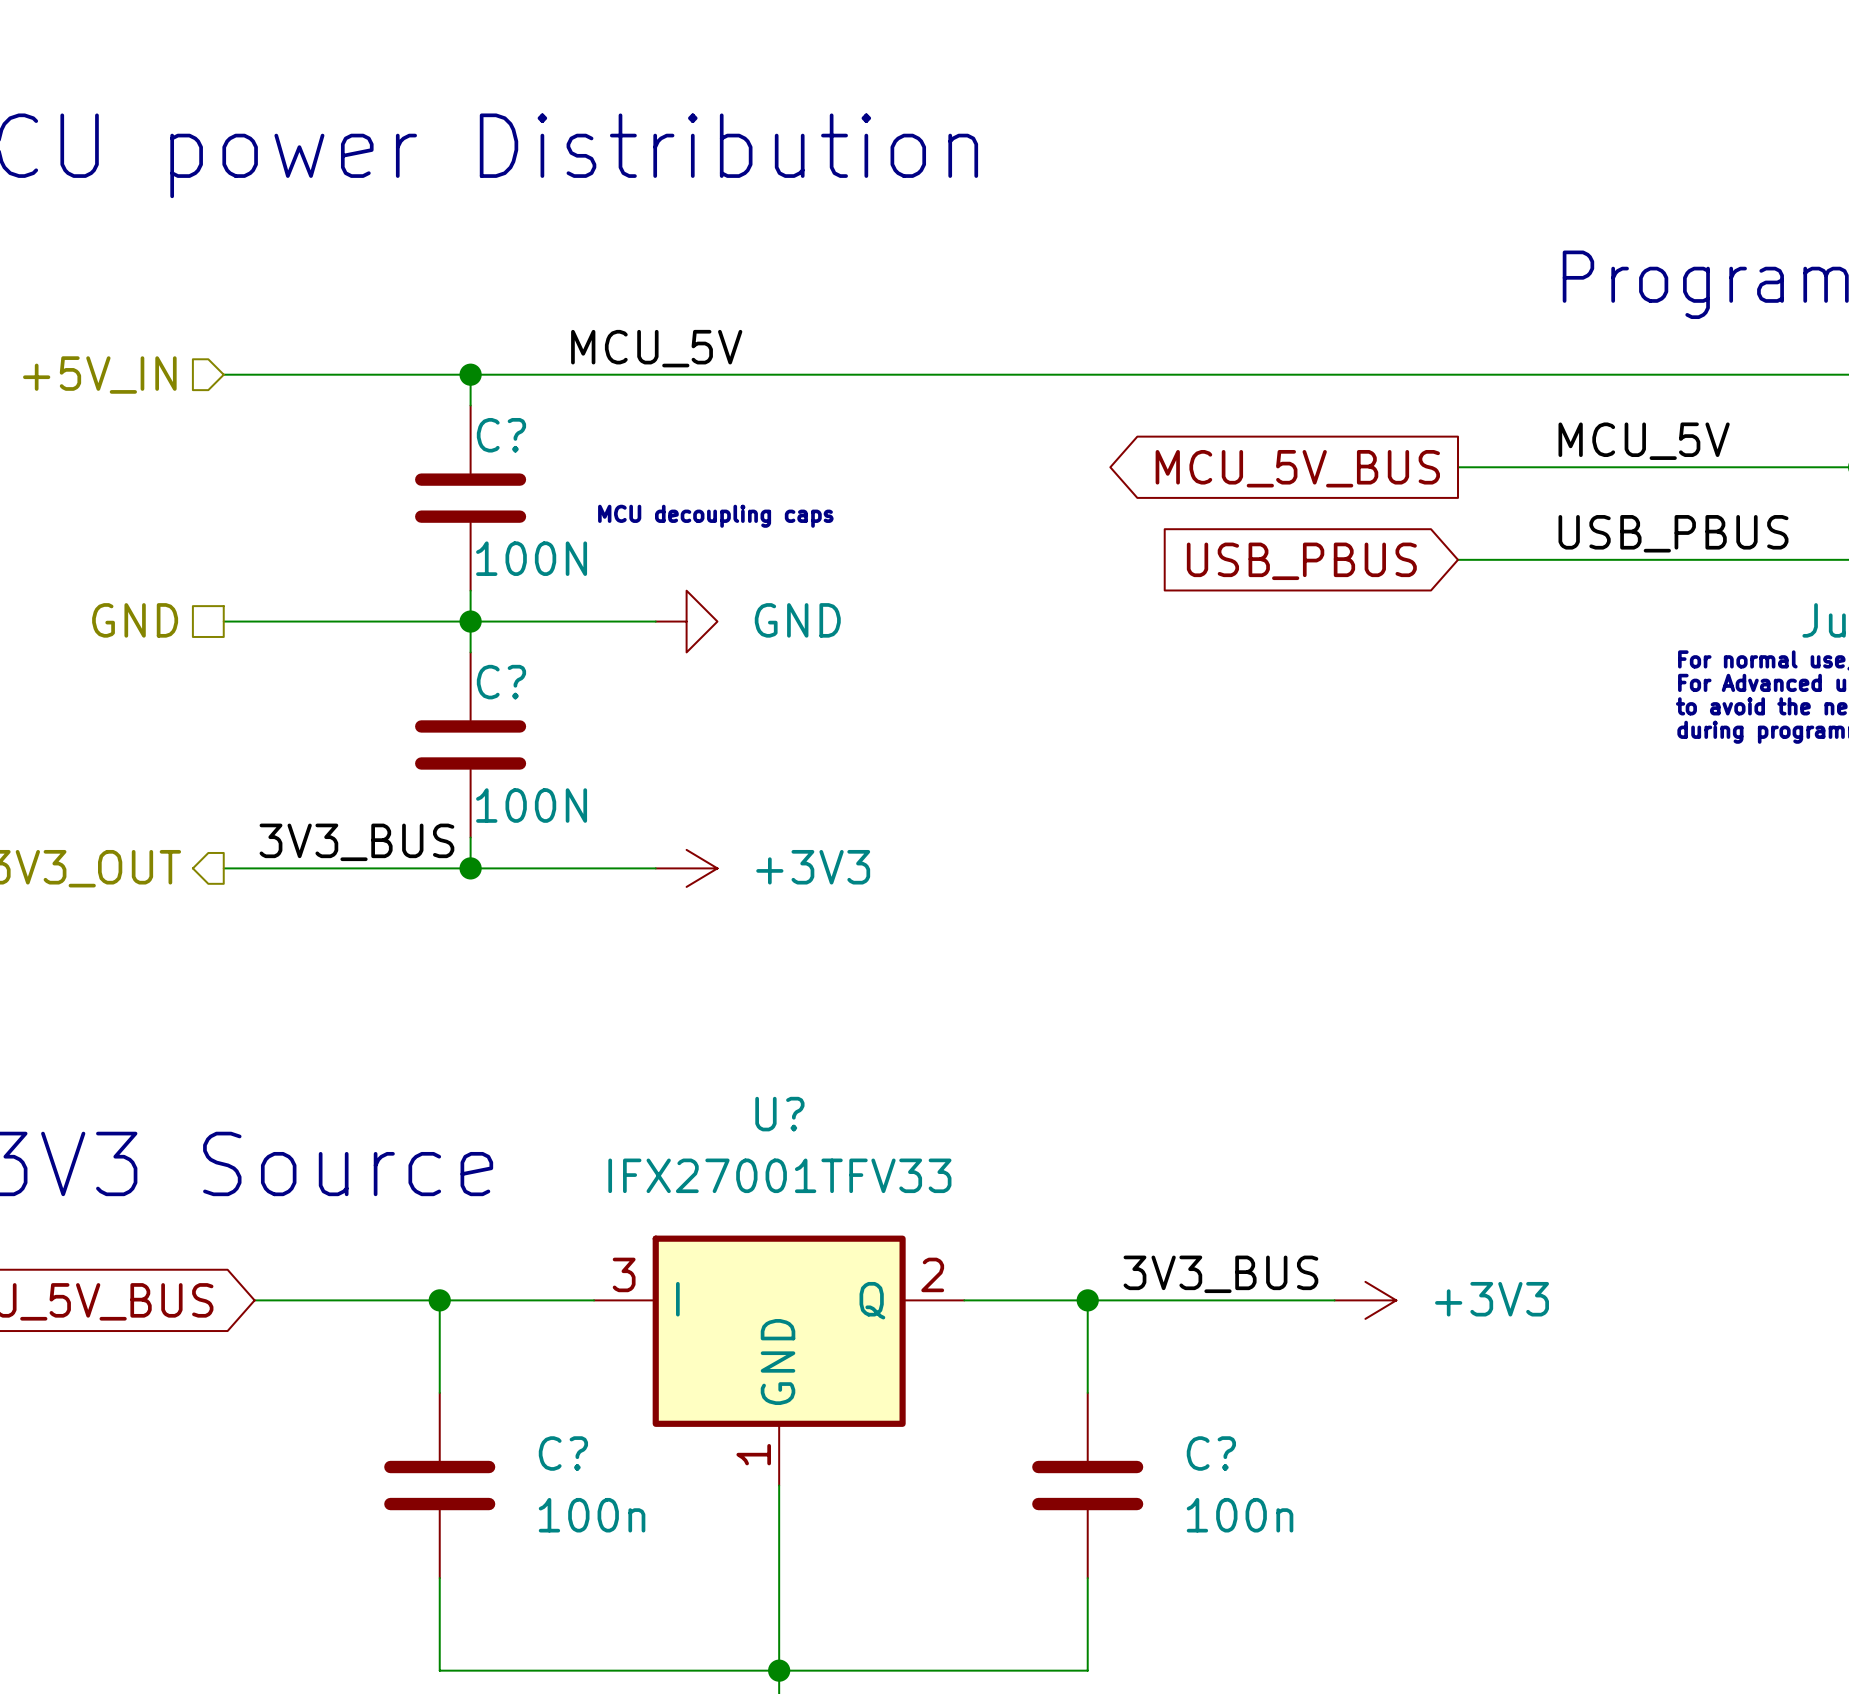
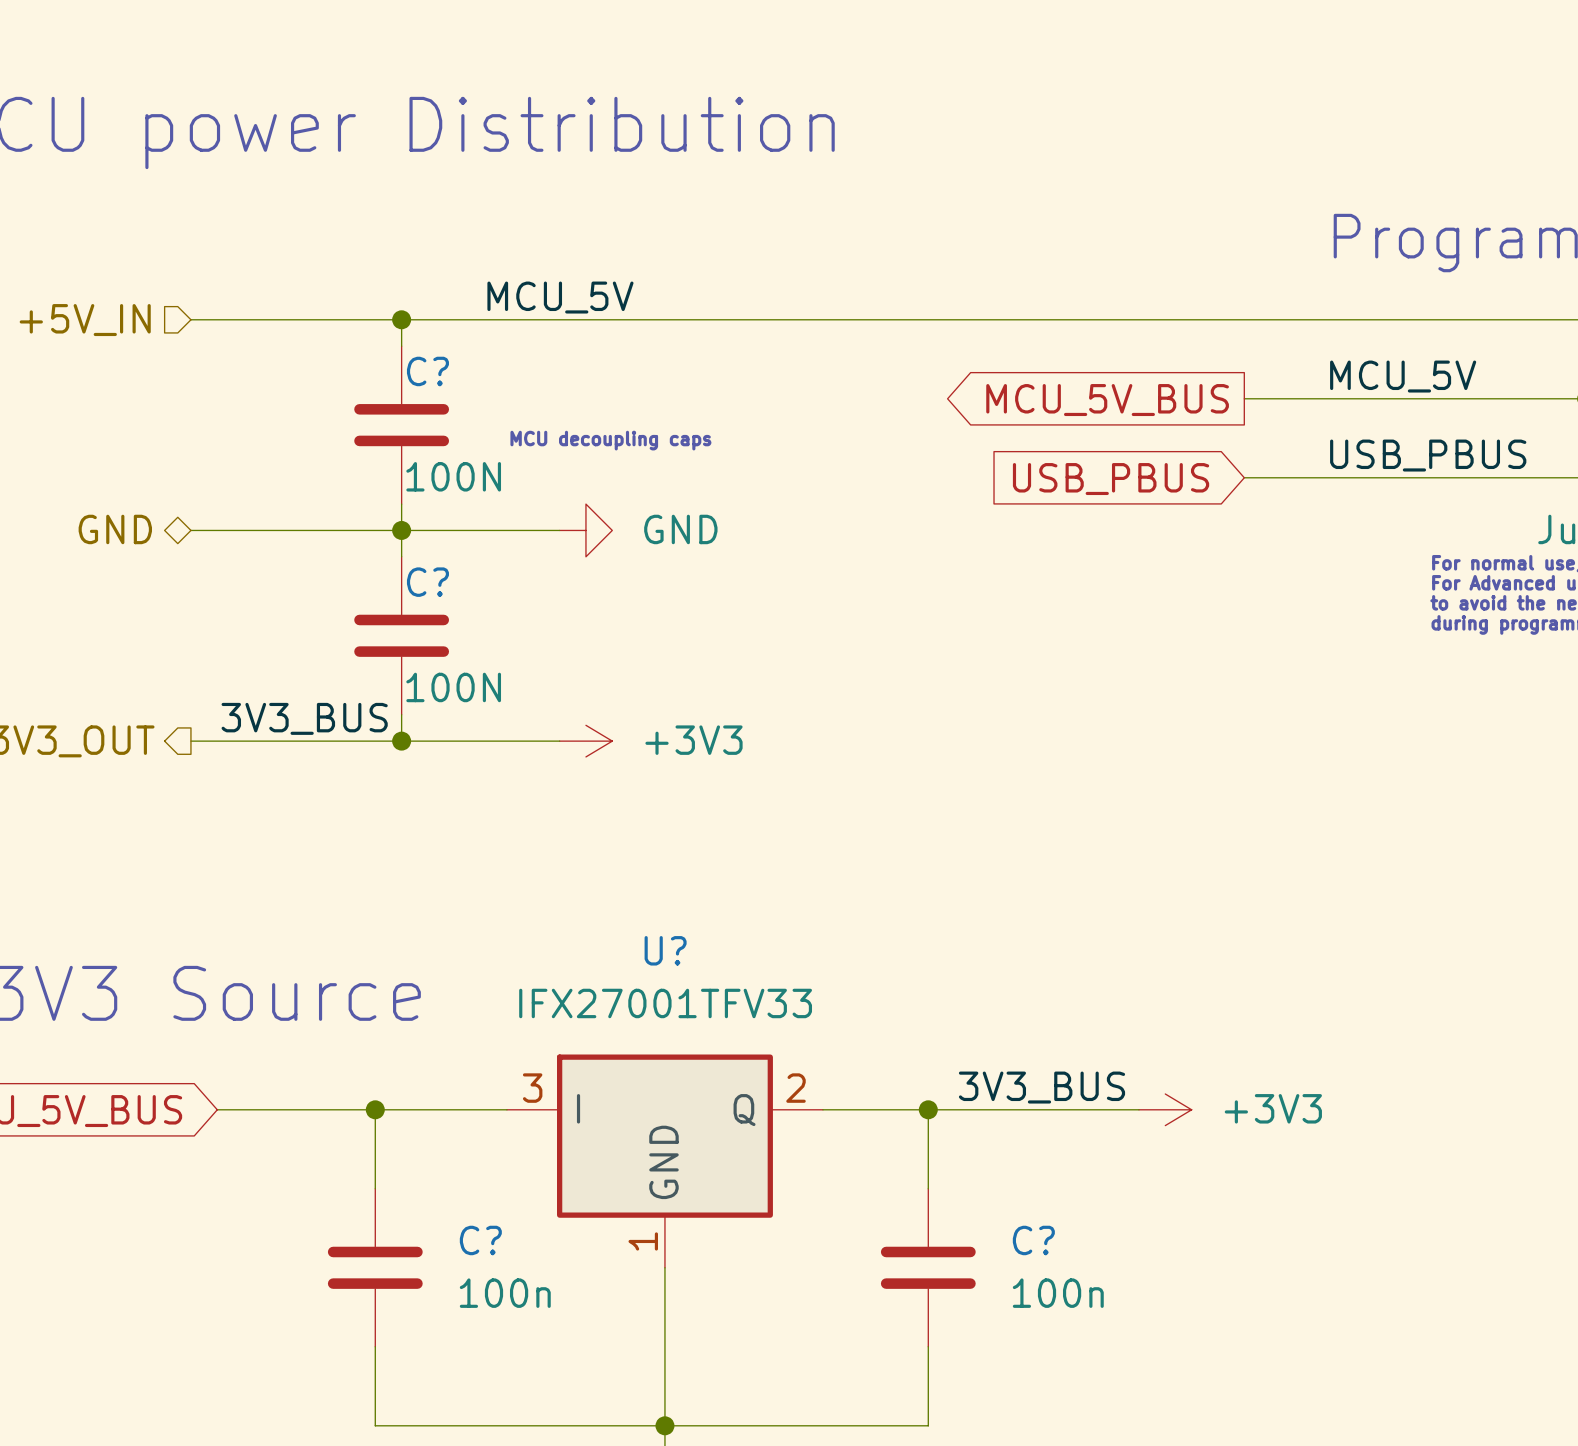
hierarchical label shape: passive (135, 620) -> bidirectional (115, 529)

